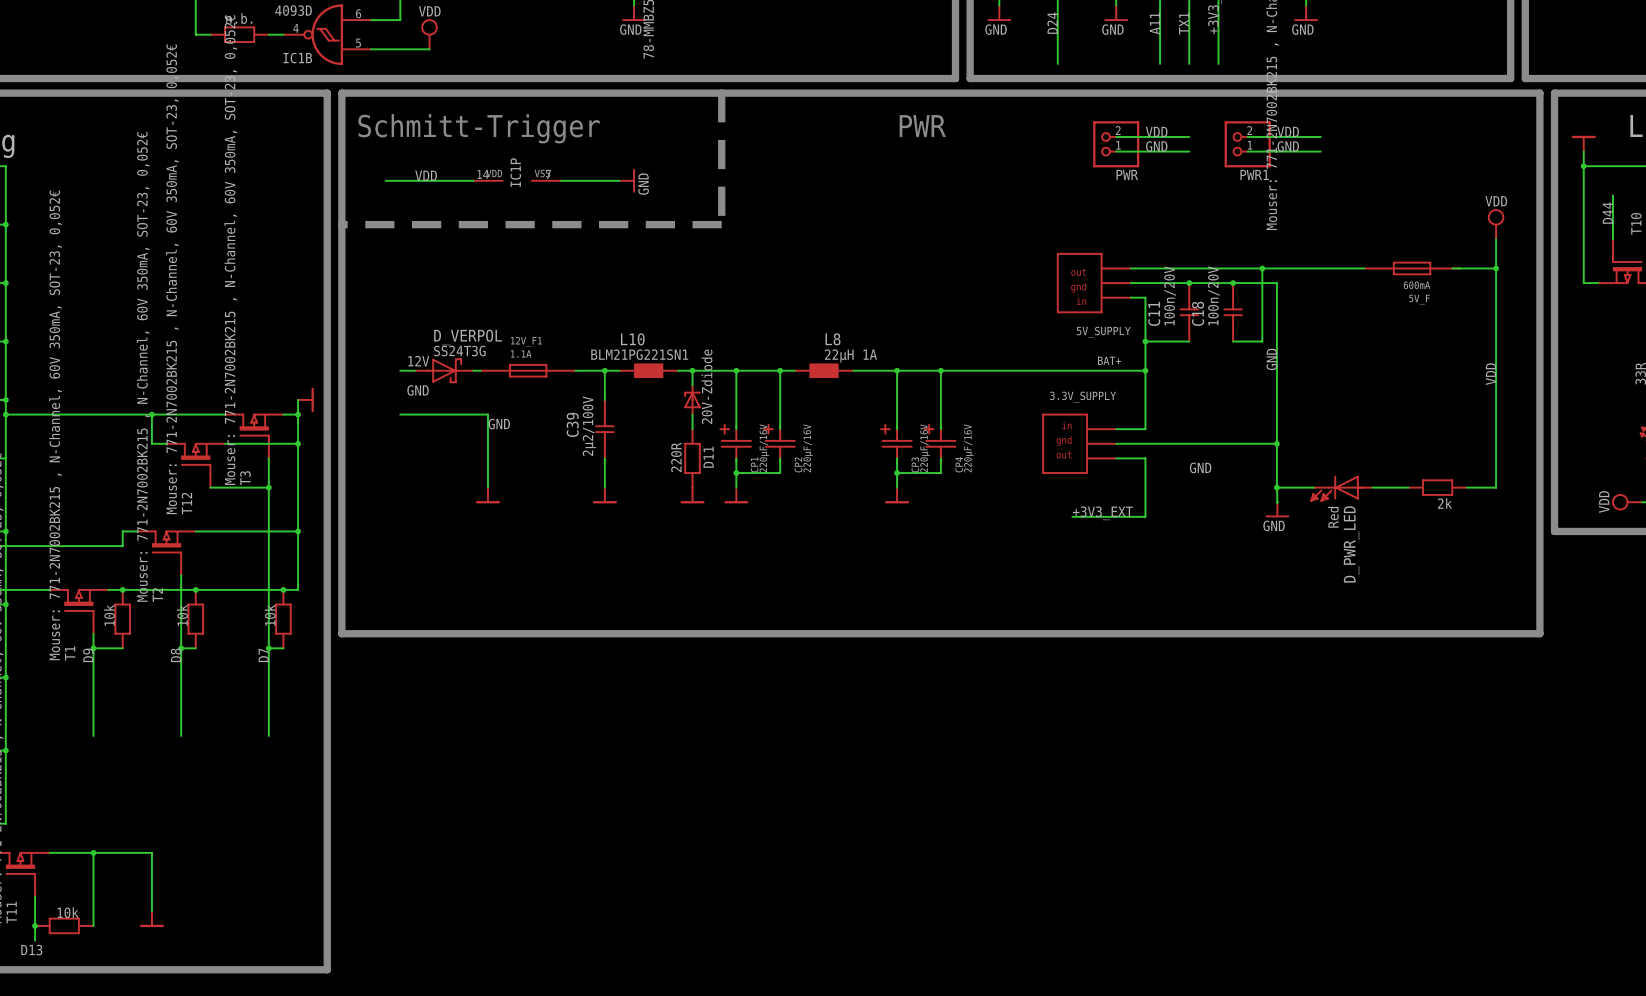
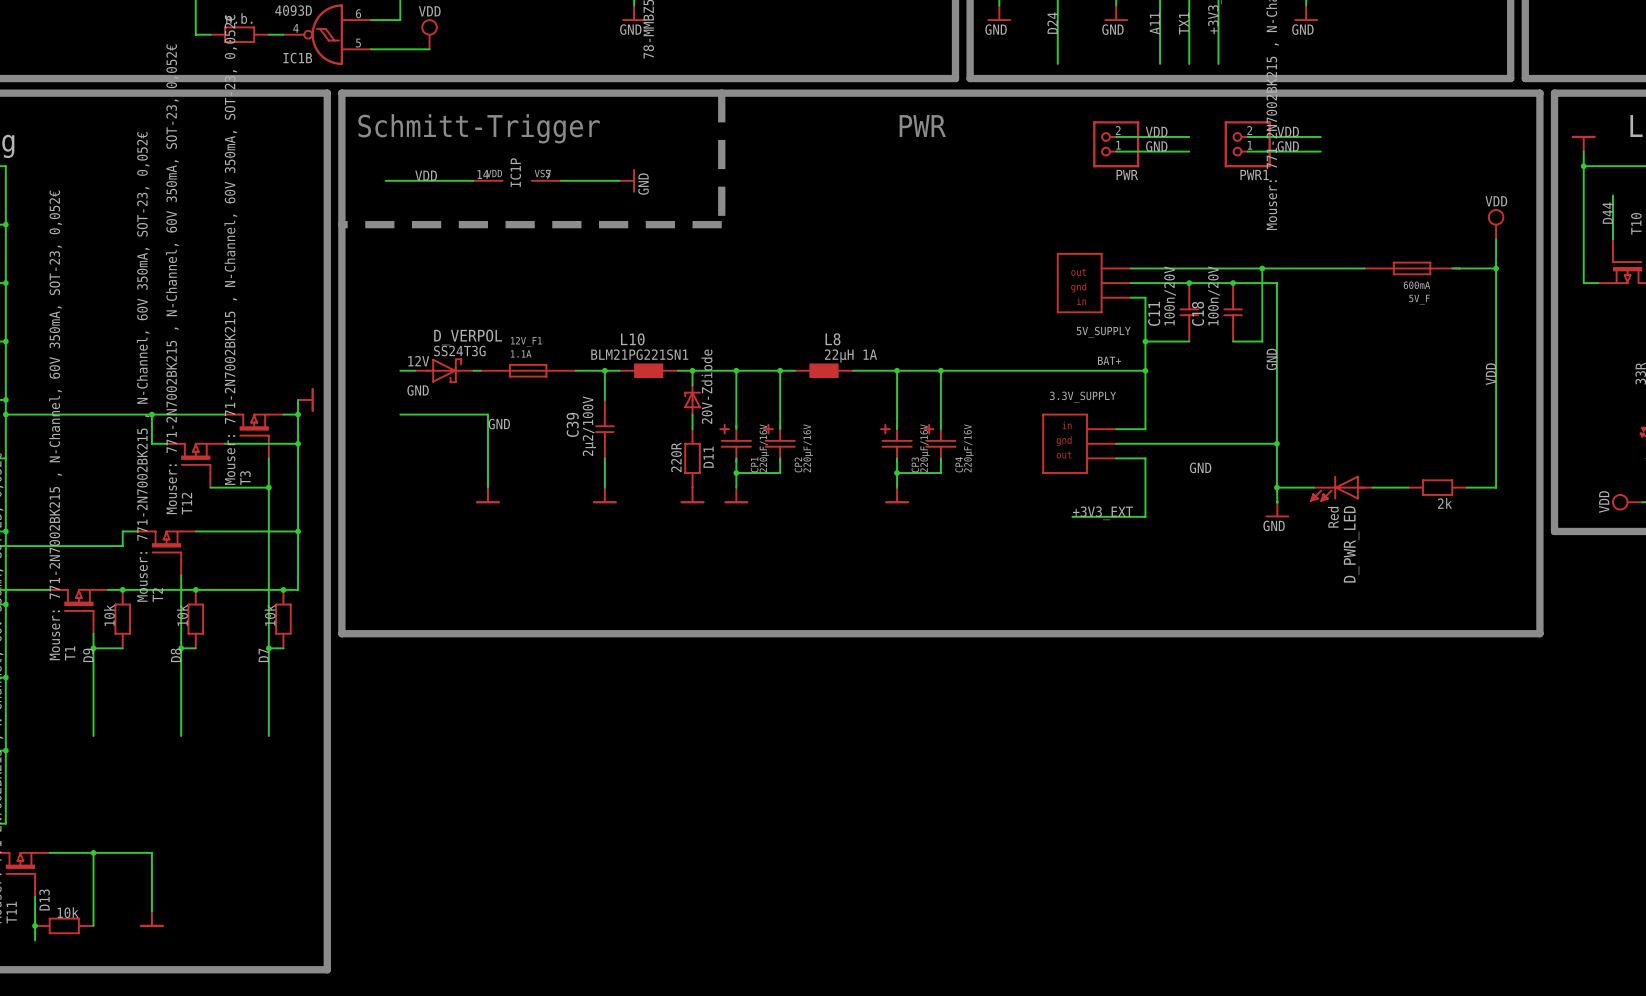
label rotation: 0° (31, 950) -> 90° counterclockwise (44, 899)
label position: D13 (31, 950) -> D13 (44, 899)

